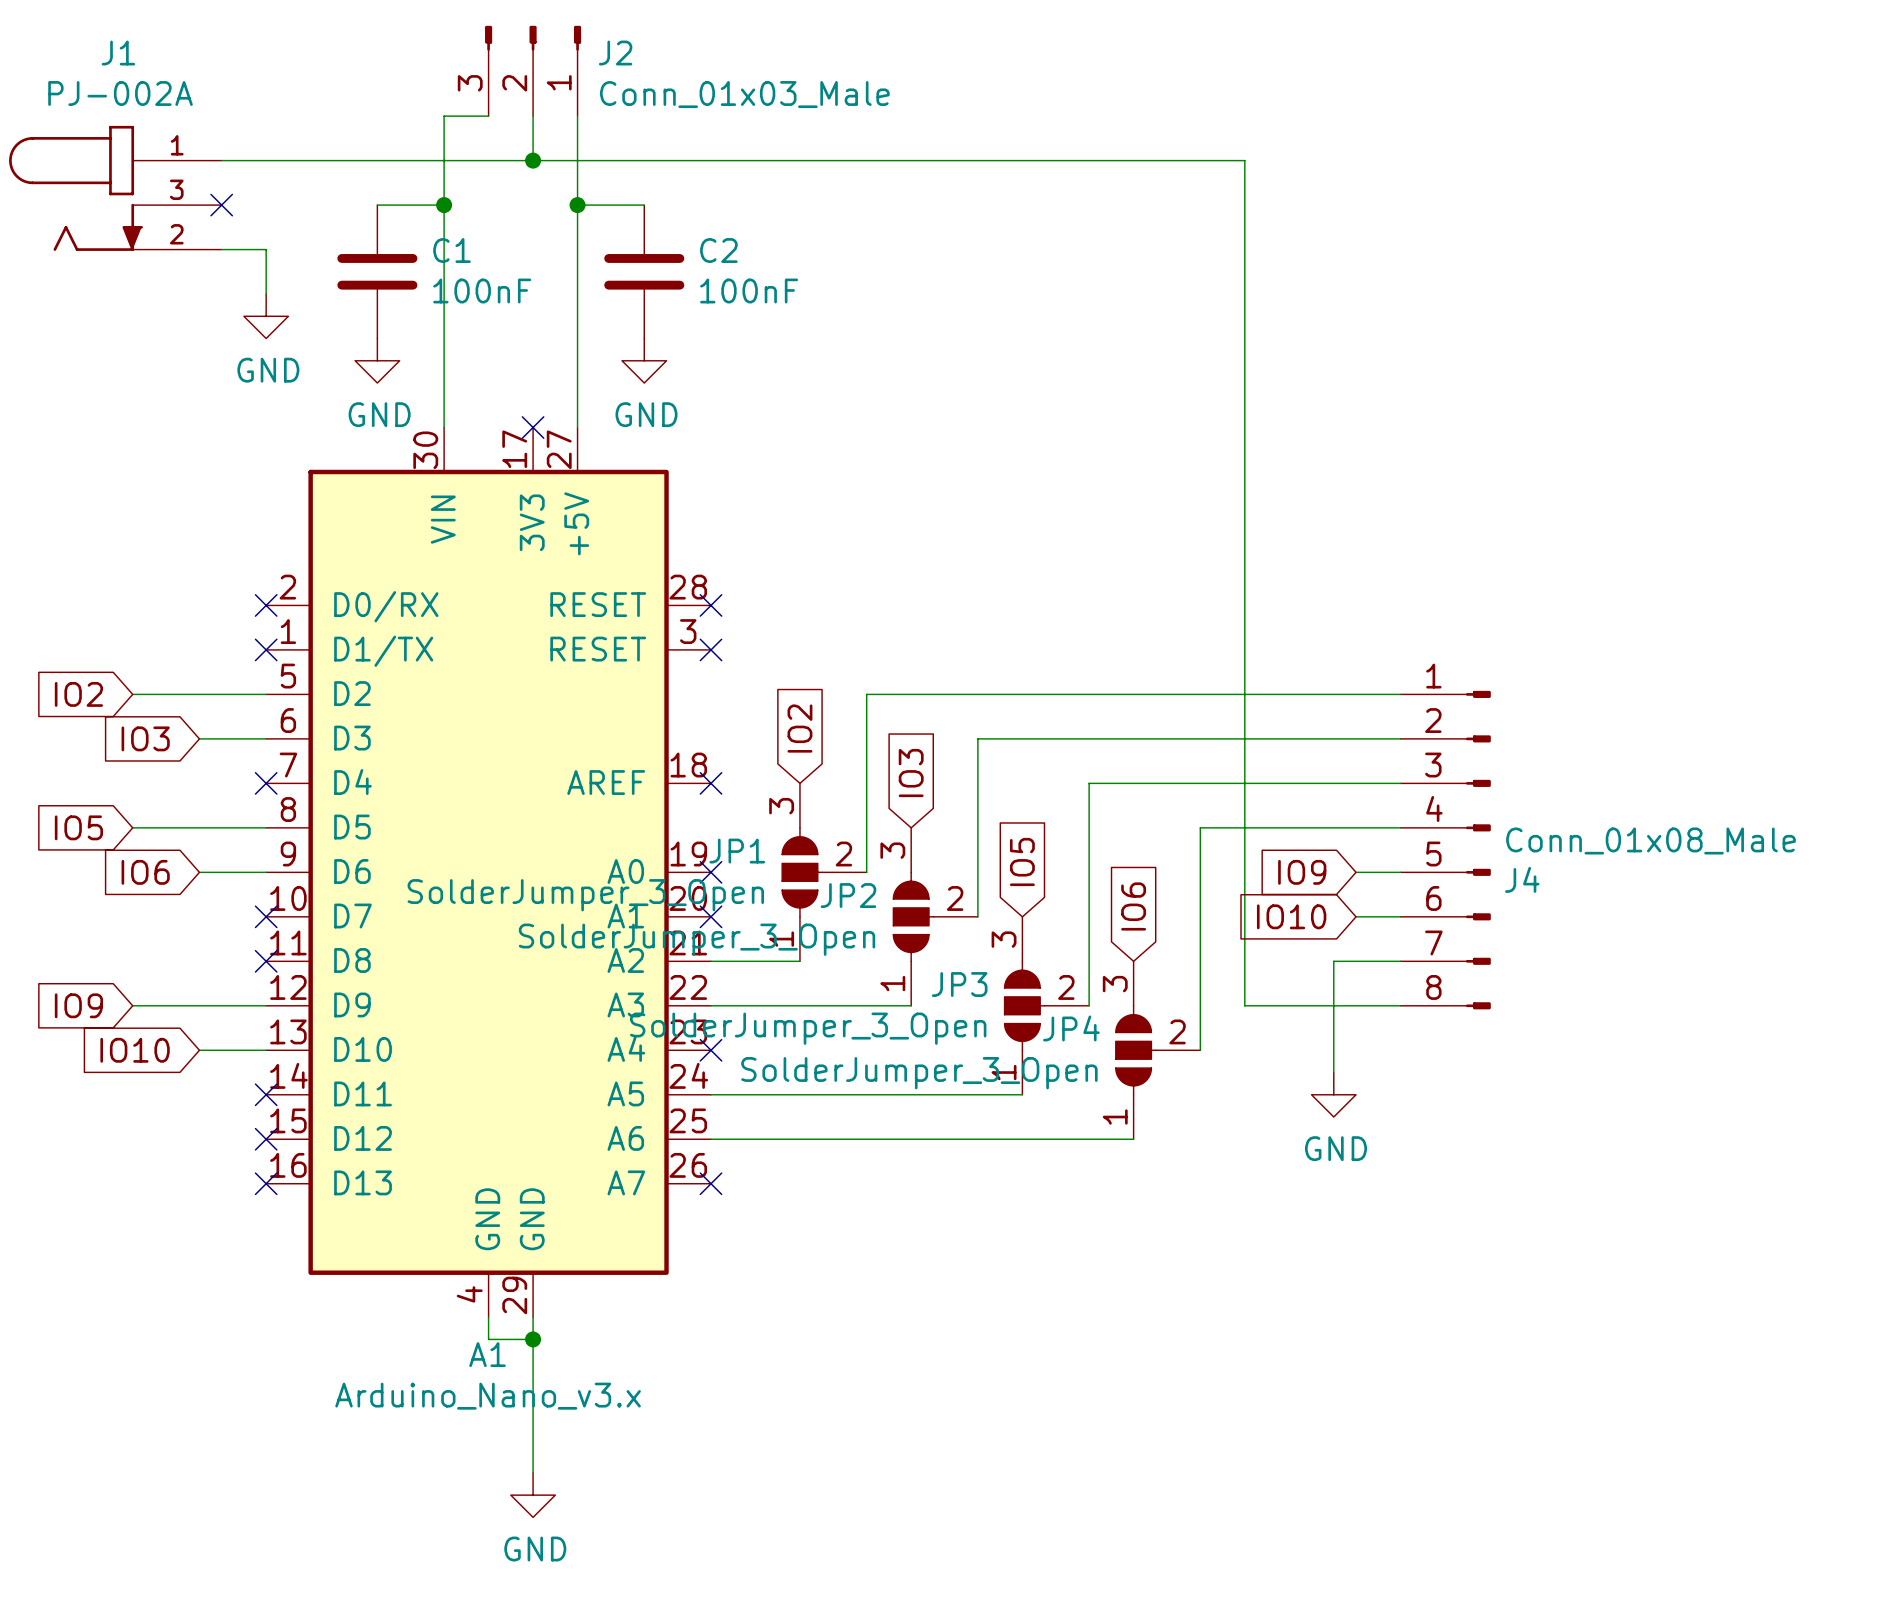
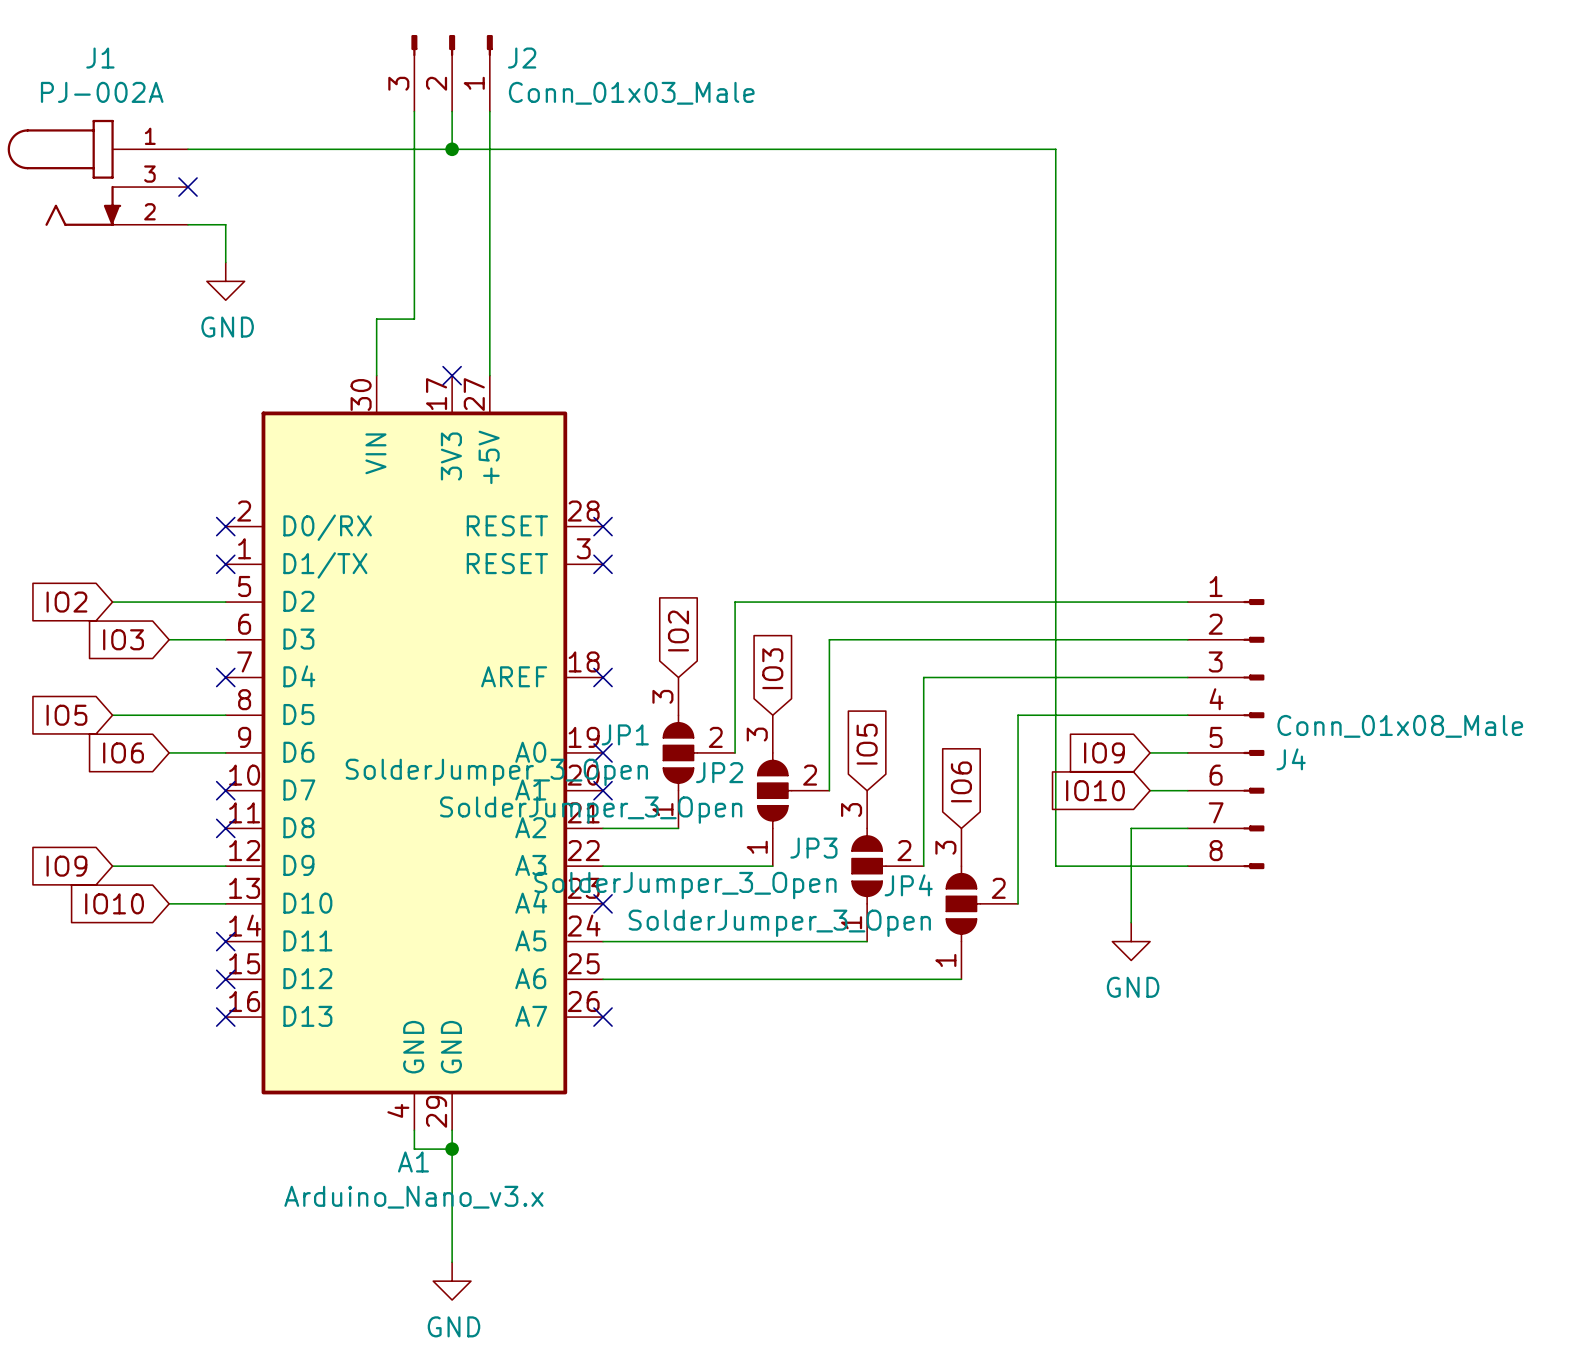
wire: (488, 116) (444, 116) (444, 360) -> (414, 111) (414, 319) (376, 319)
wire: (377, 205) (444, 205) -> none
junction: (444, 205) -> none
wire: (577, 205) (644, 205) -> none
junction: (577, 205) -> none
C1: 100nF (377, 271) -> none
C2: 100nF (644, 271) -> none
power symbol: GND (377, 360) -> none
power symbol: GND (644, 360) -> none

